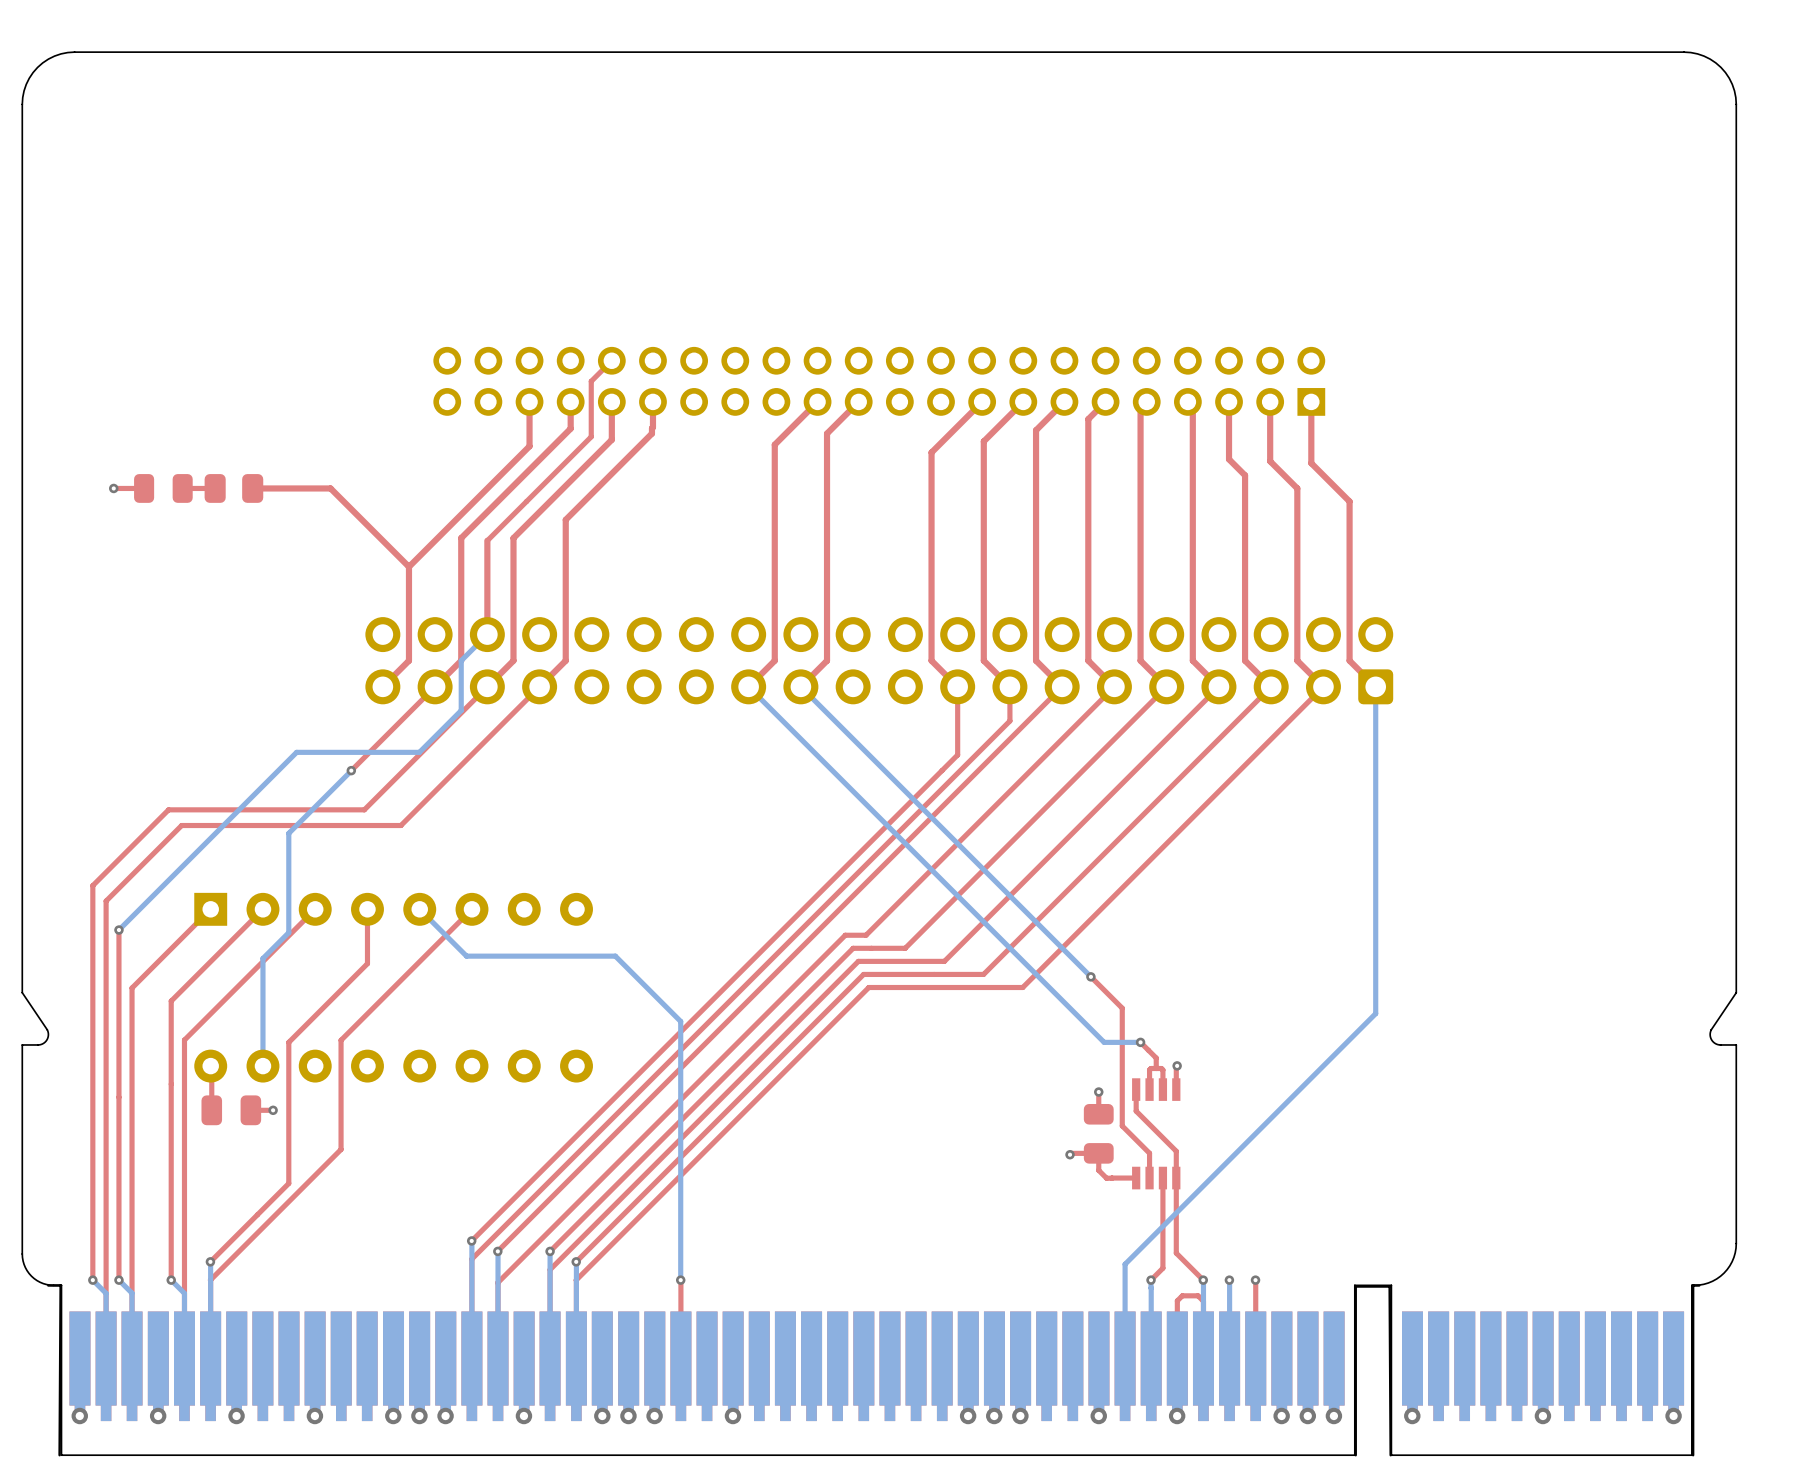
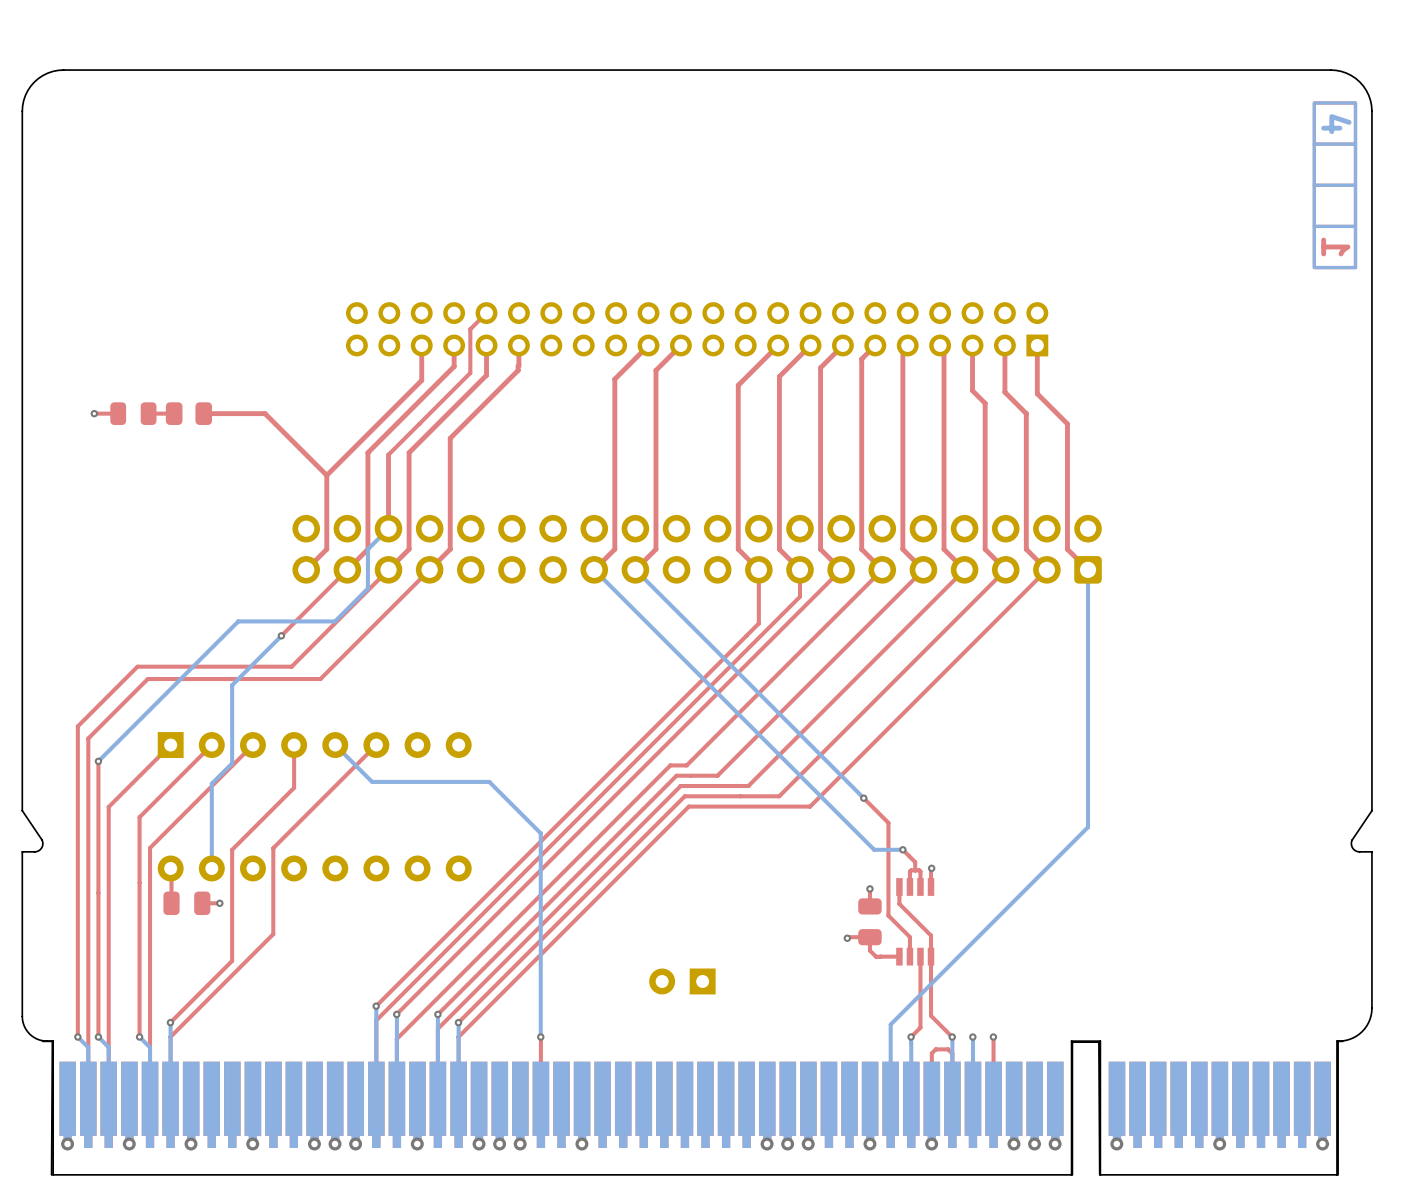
drawing: none -> [1312, 101, 1358, 270]
part: none -> (682, 981)

